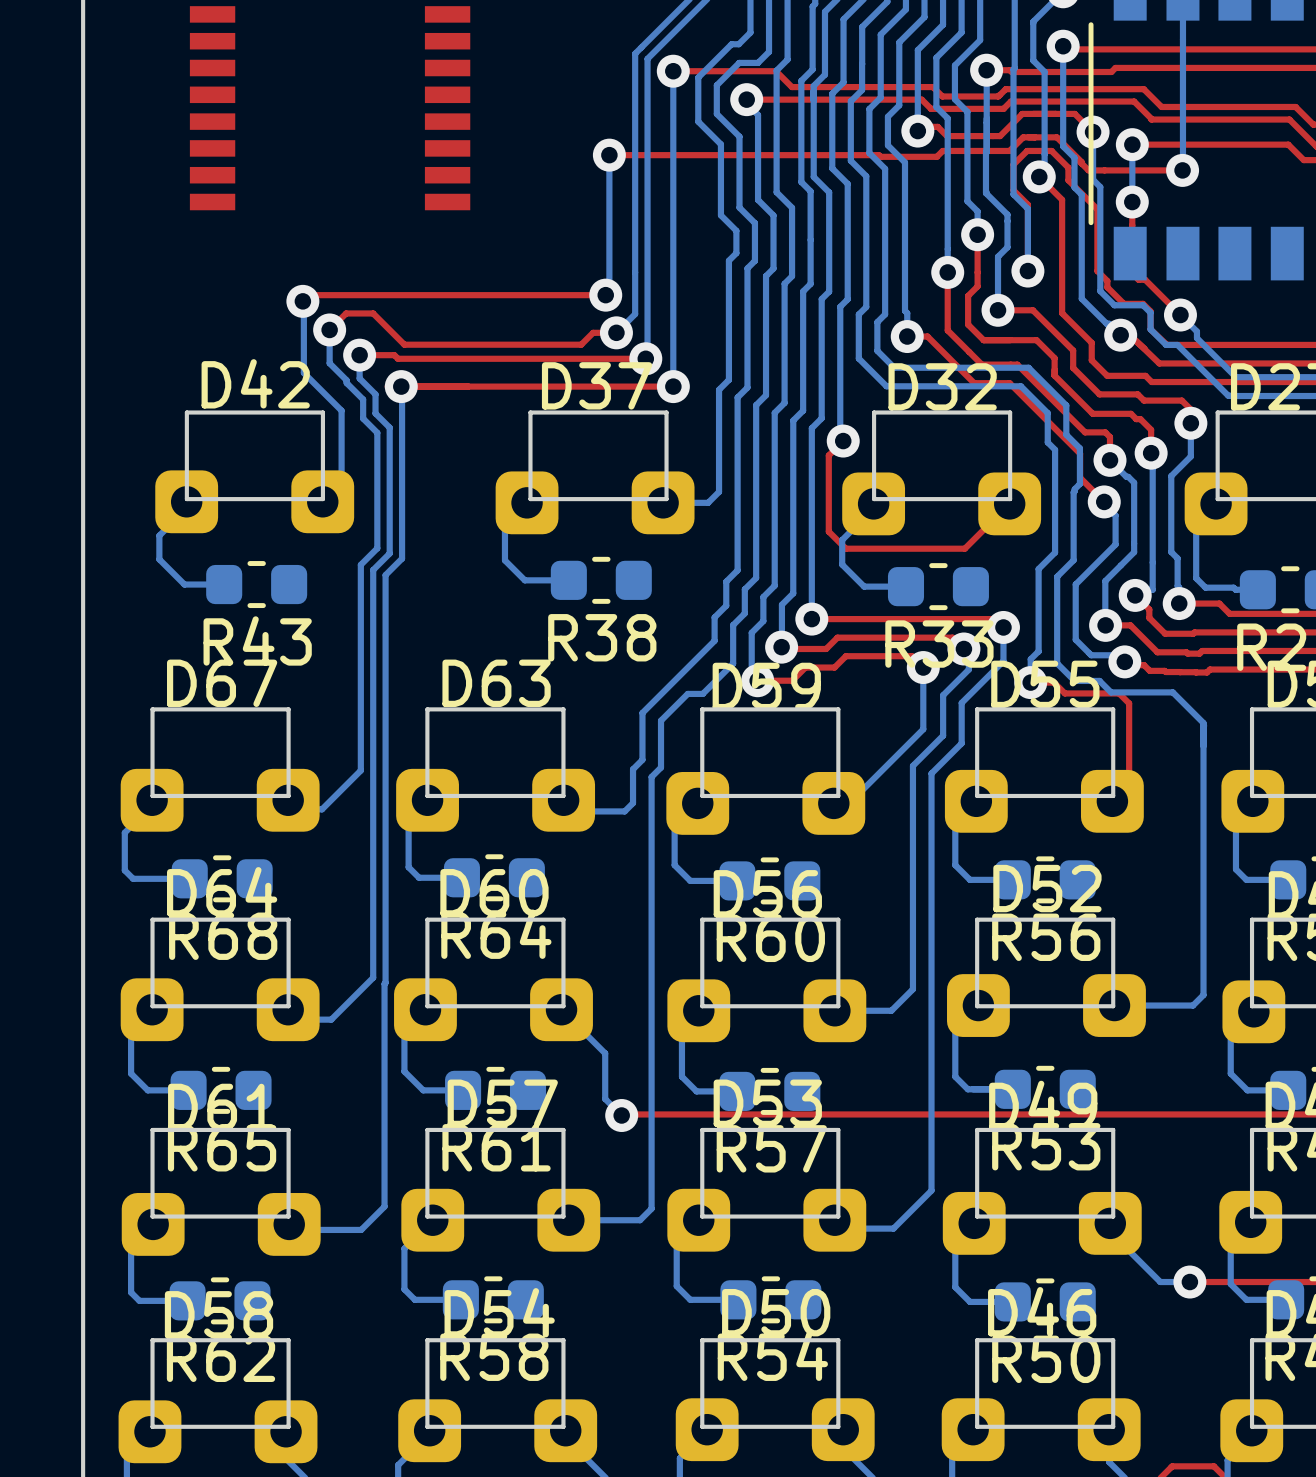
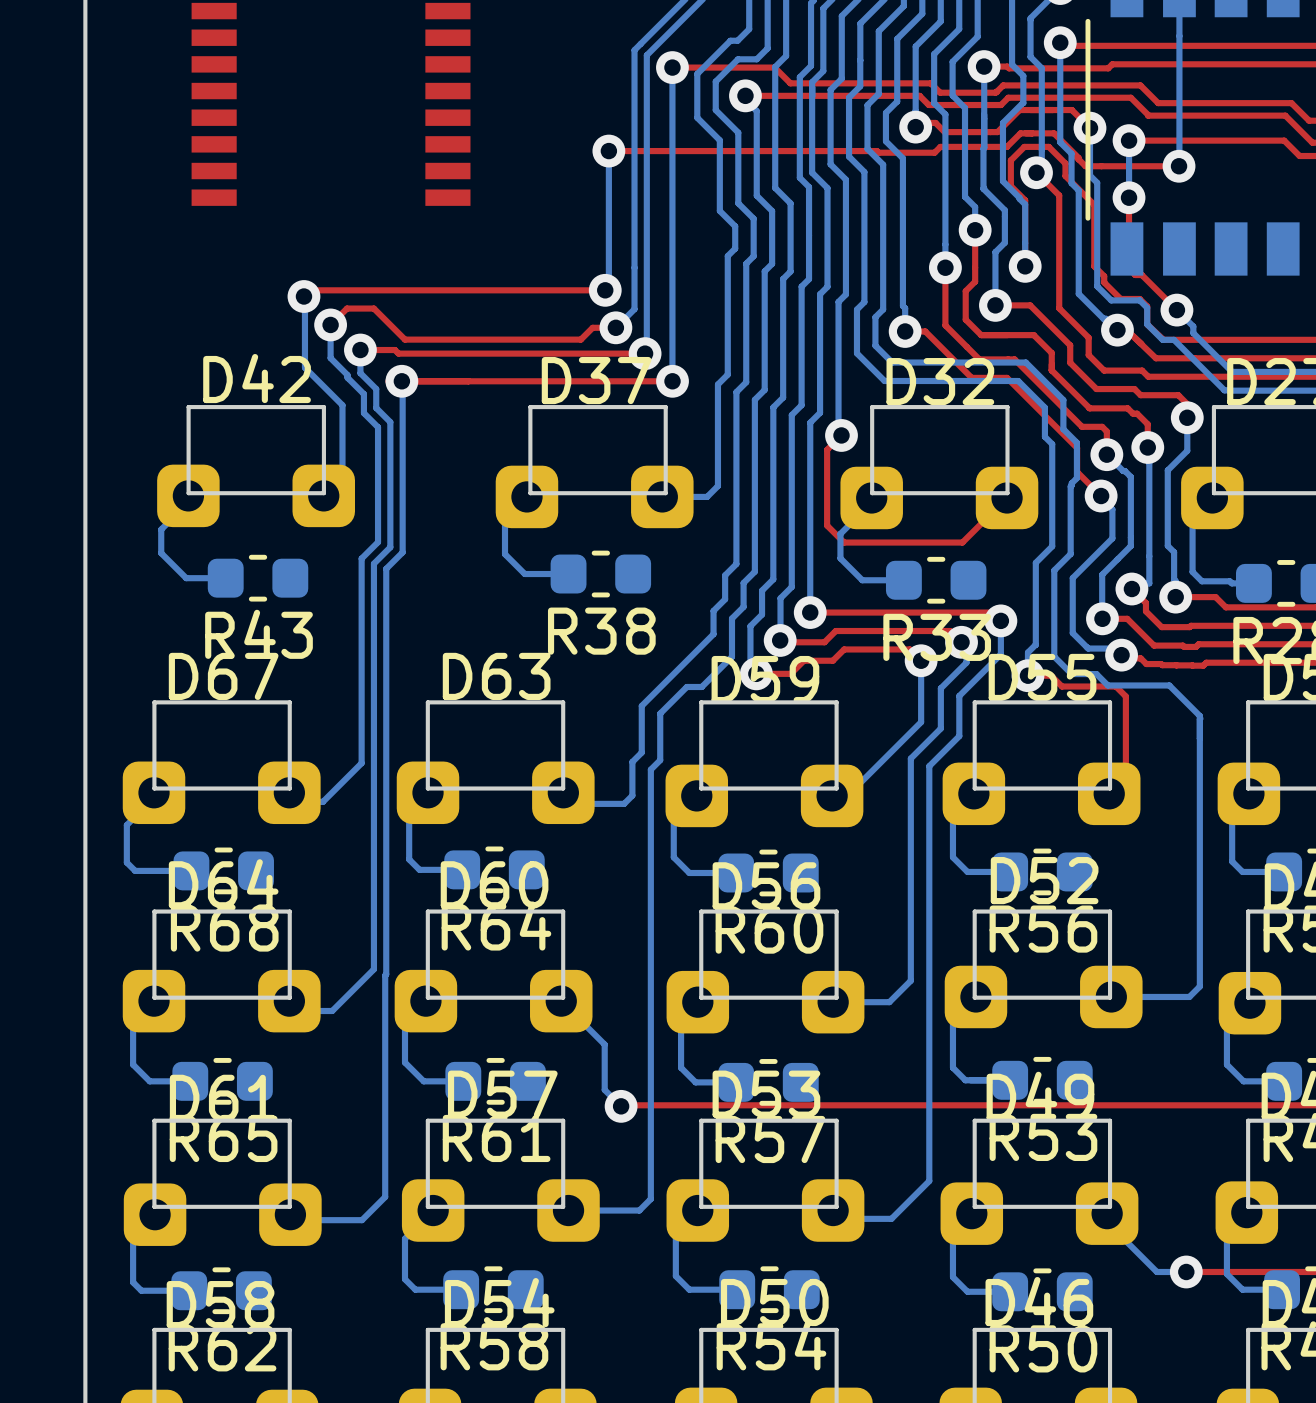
bottom track: (1014, 68) (1013, 194) (1022, 203) -> (1022, 103) (1002, 122) (1002, 181) (1019, 198)
bottom track: none -> (1012, 64) (1023, 75) (1023, 103)

